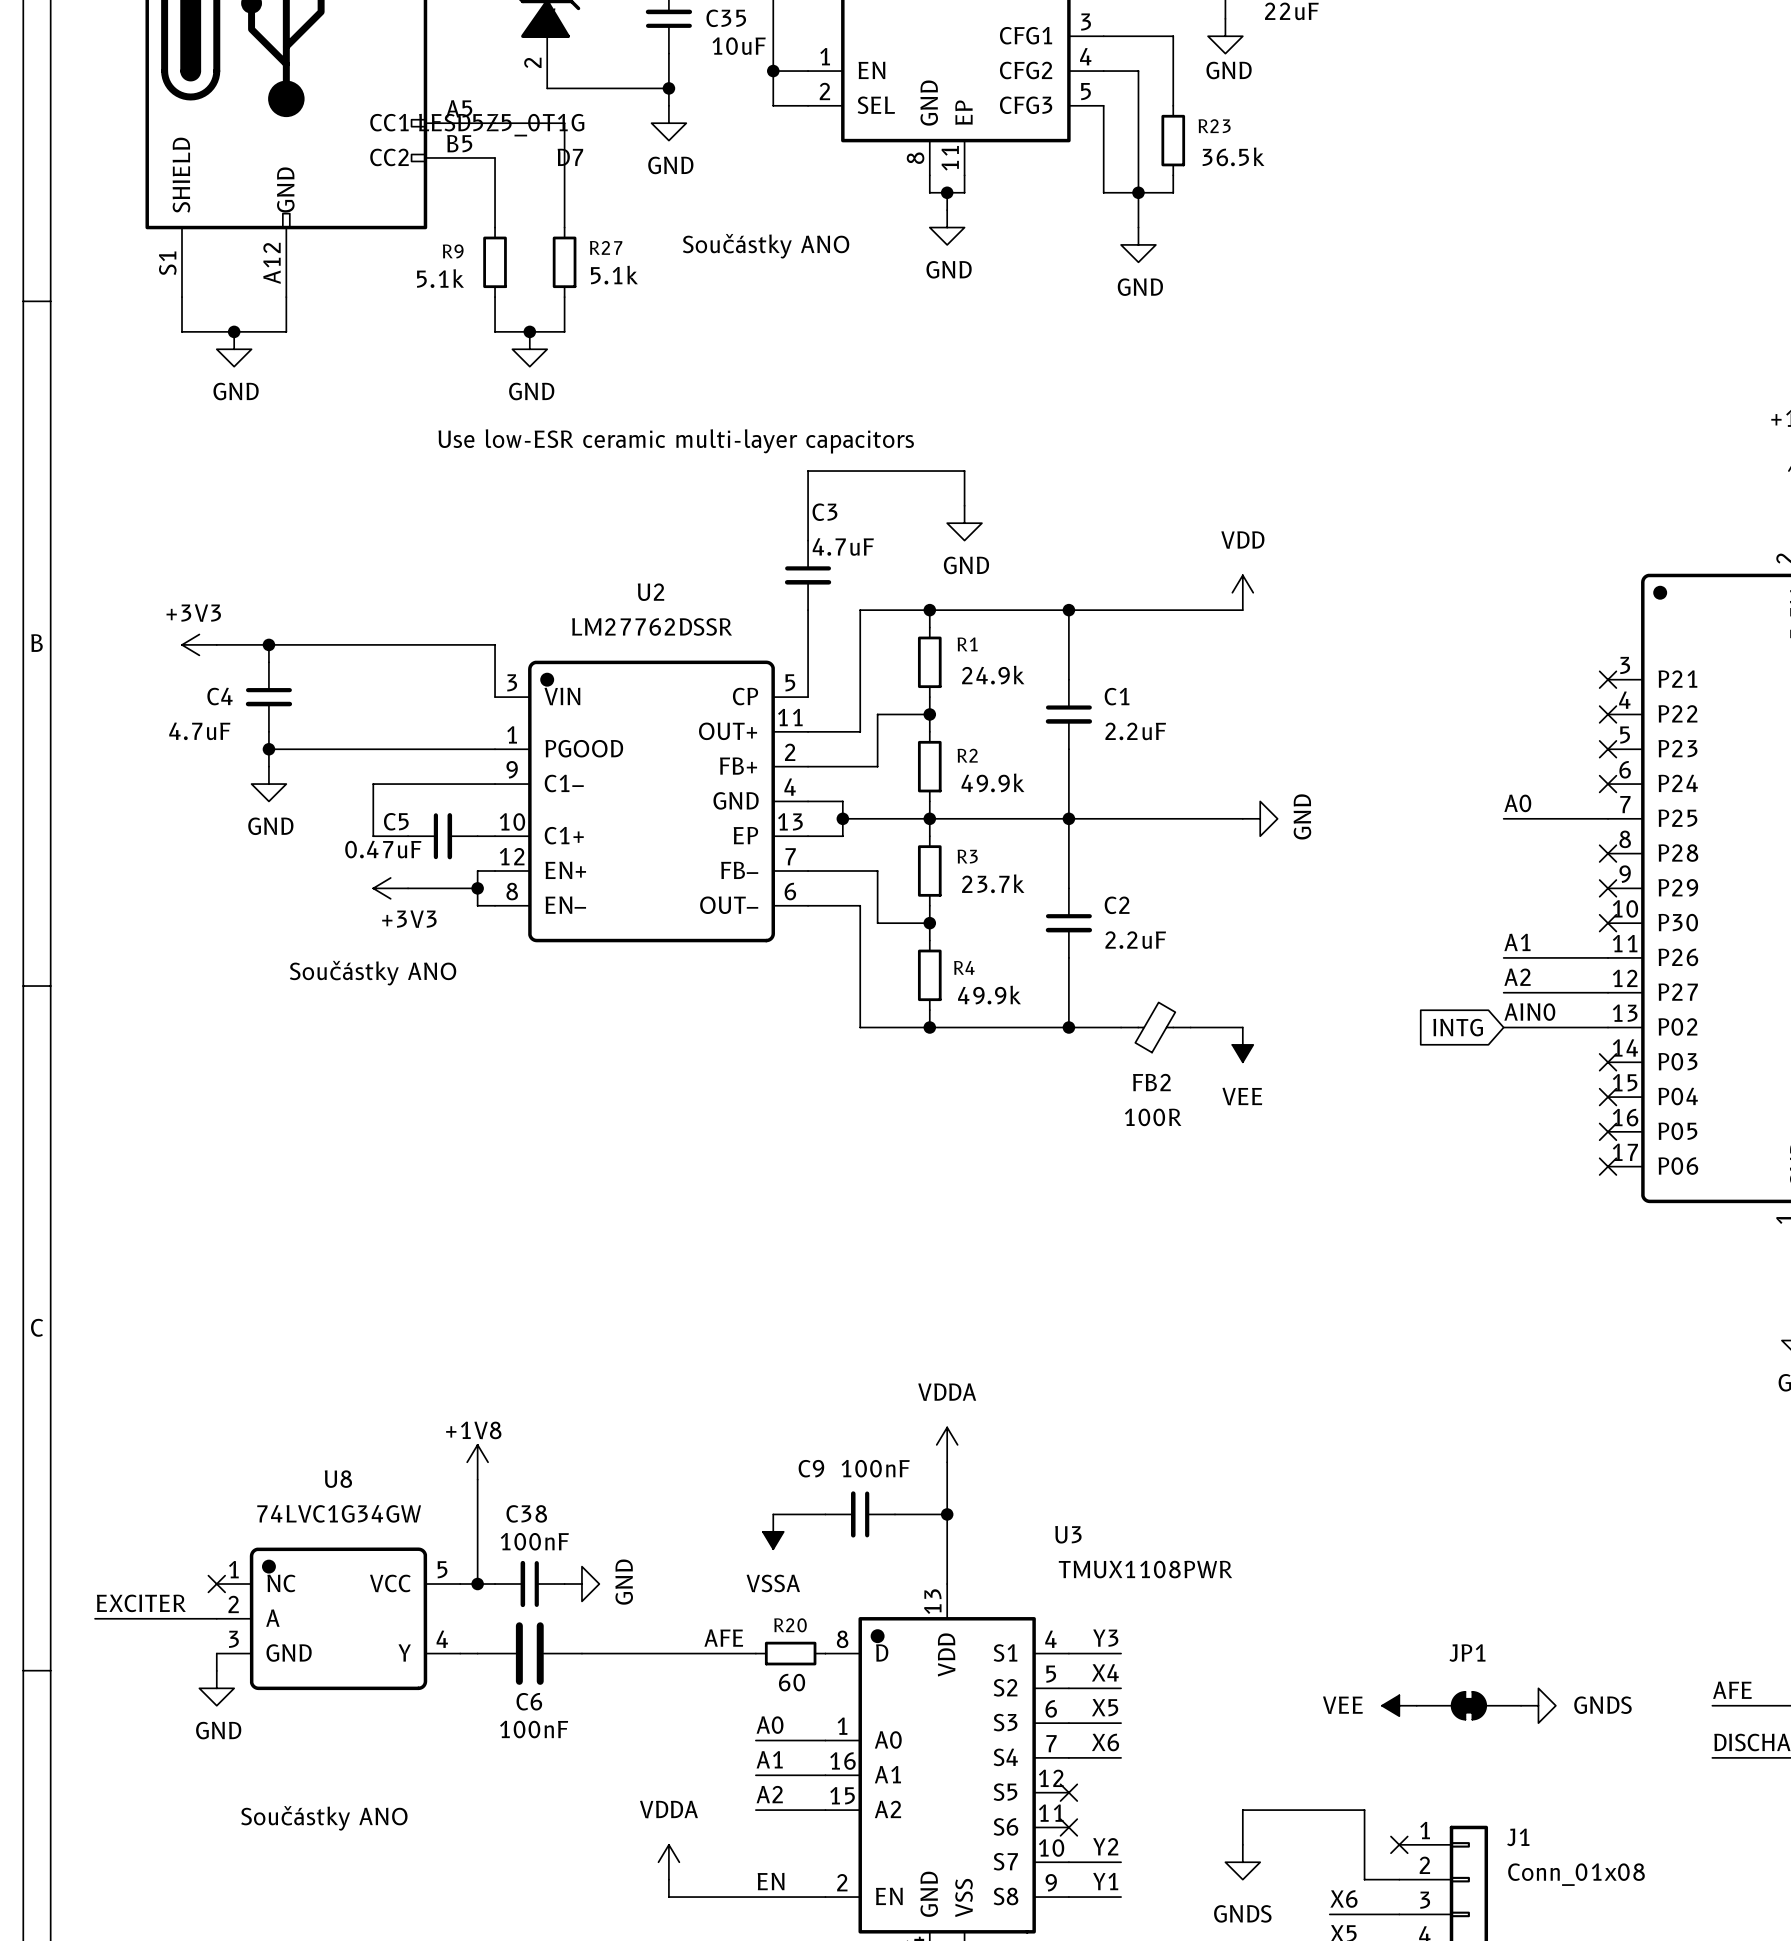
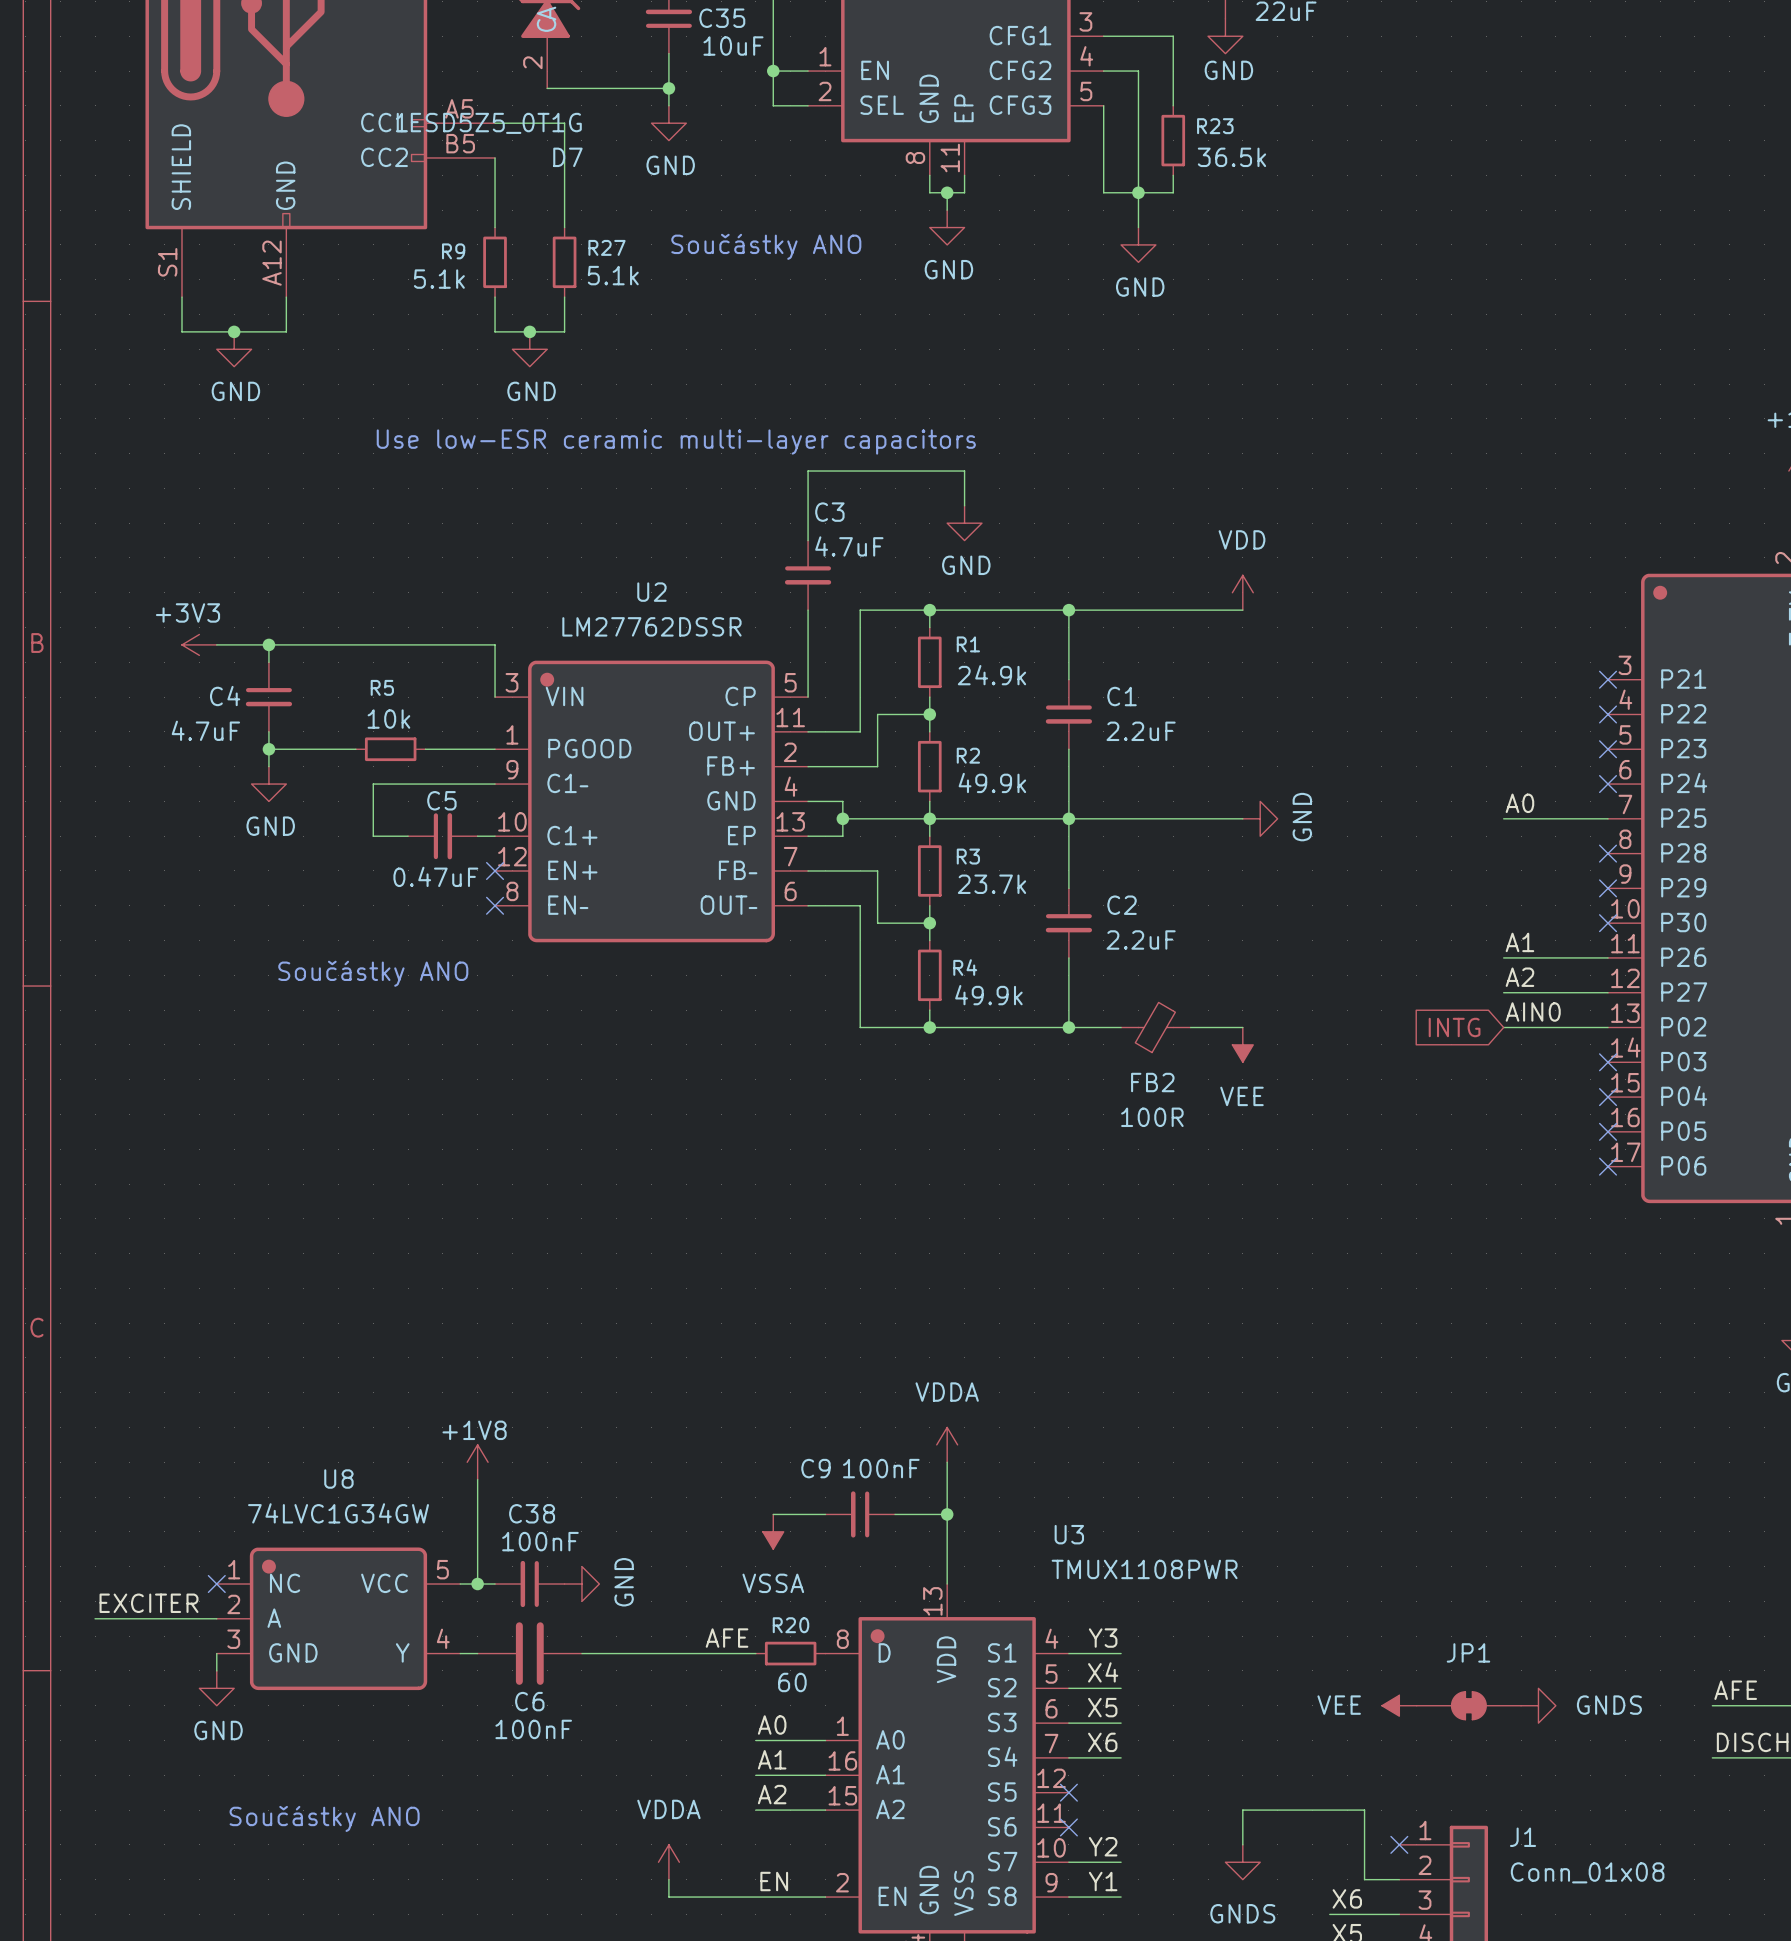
wire: (355, 749) (425, 749) -> none
R5: none -> 10k (390, 749)
C5 name position: C5 (396, 821) -> C5 (441, 800)
C5 value position: 0.47uF (383, 849) -> 0.47uF (435, 876)
wire: (495, 870) (477, 870) (477, 905) (495, 905) -> none
no-connect mark: none -> (495, 870)
power symbol: +3V3 (390, 888) -> none
wire: (408, 888) (477, 888) -> none
junction: (477, 888) -> none
no-connect mark: none -> (495, 905)

